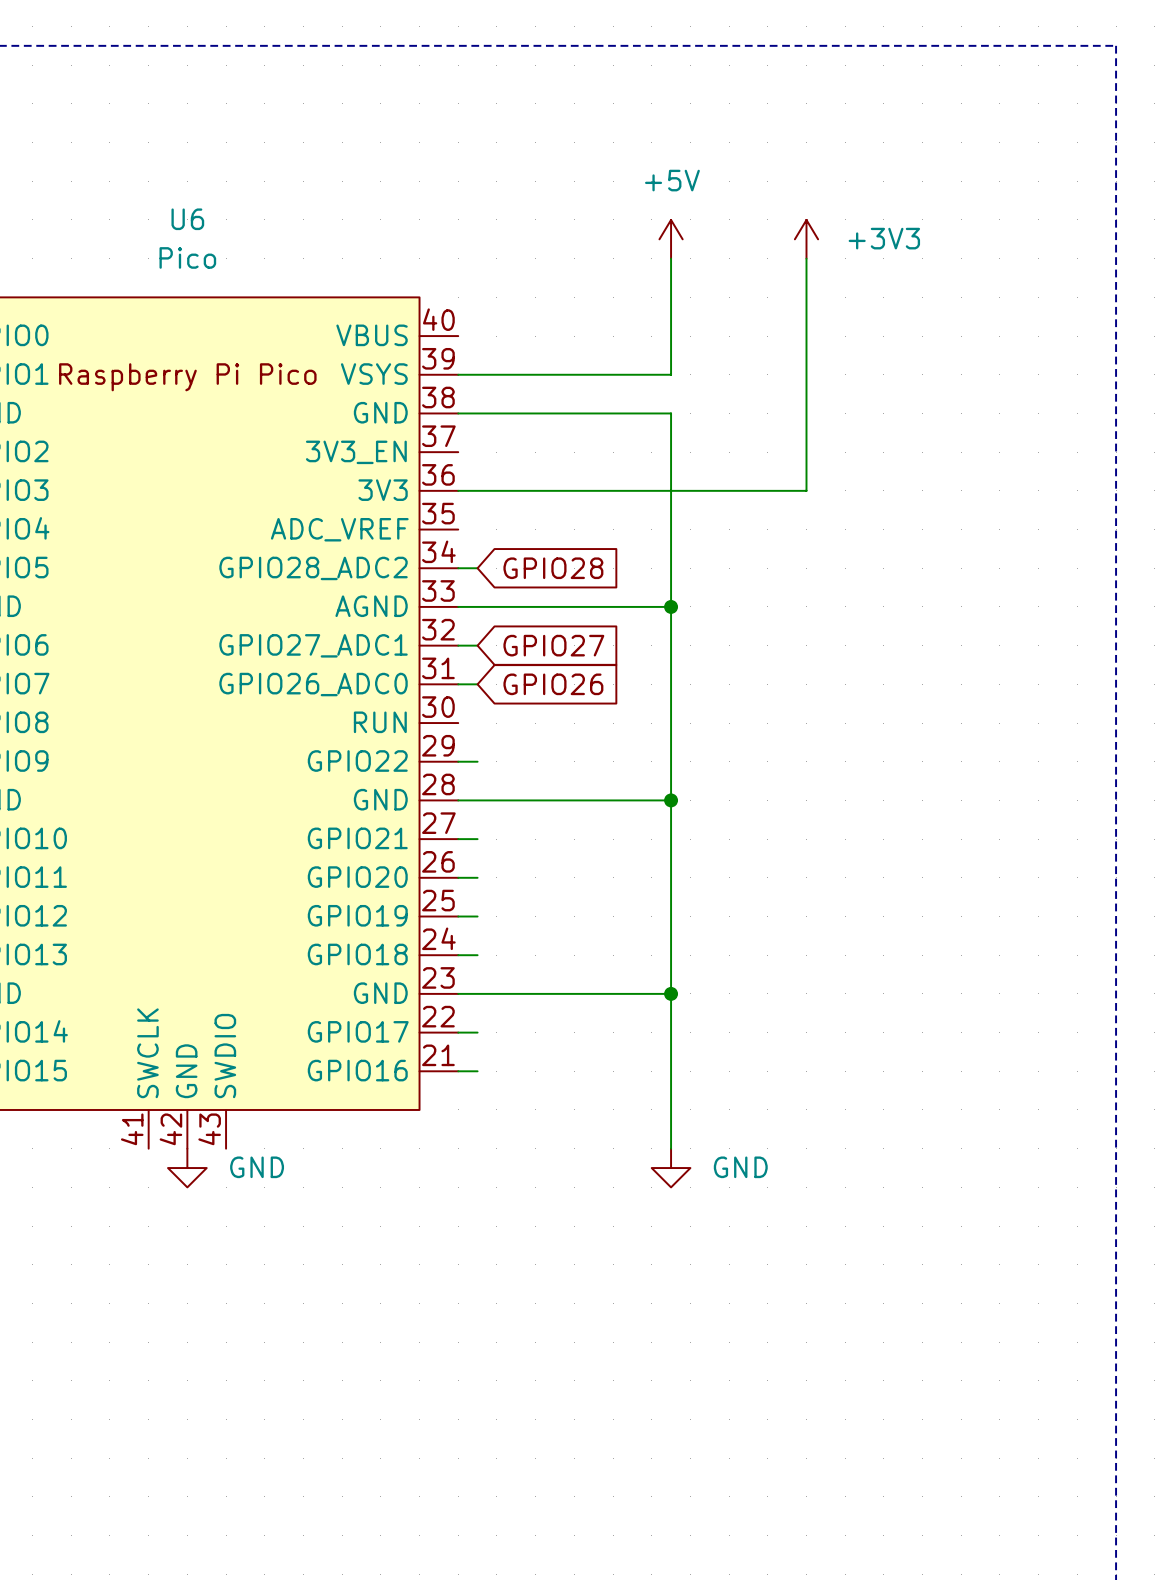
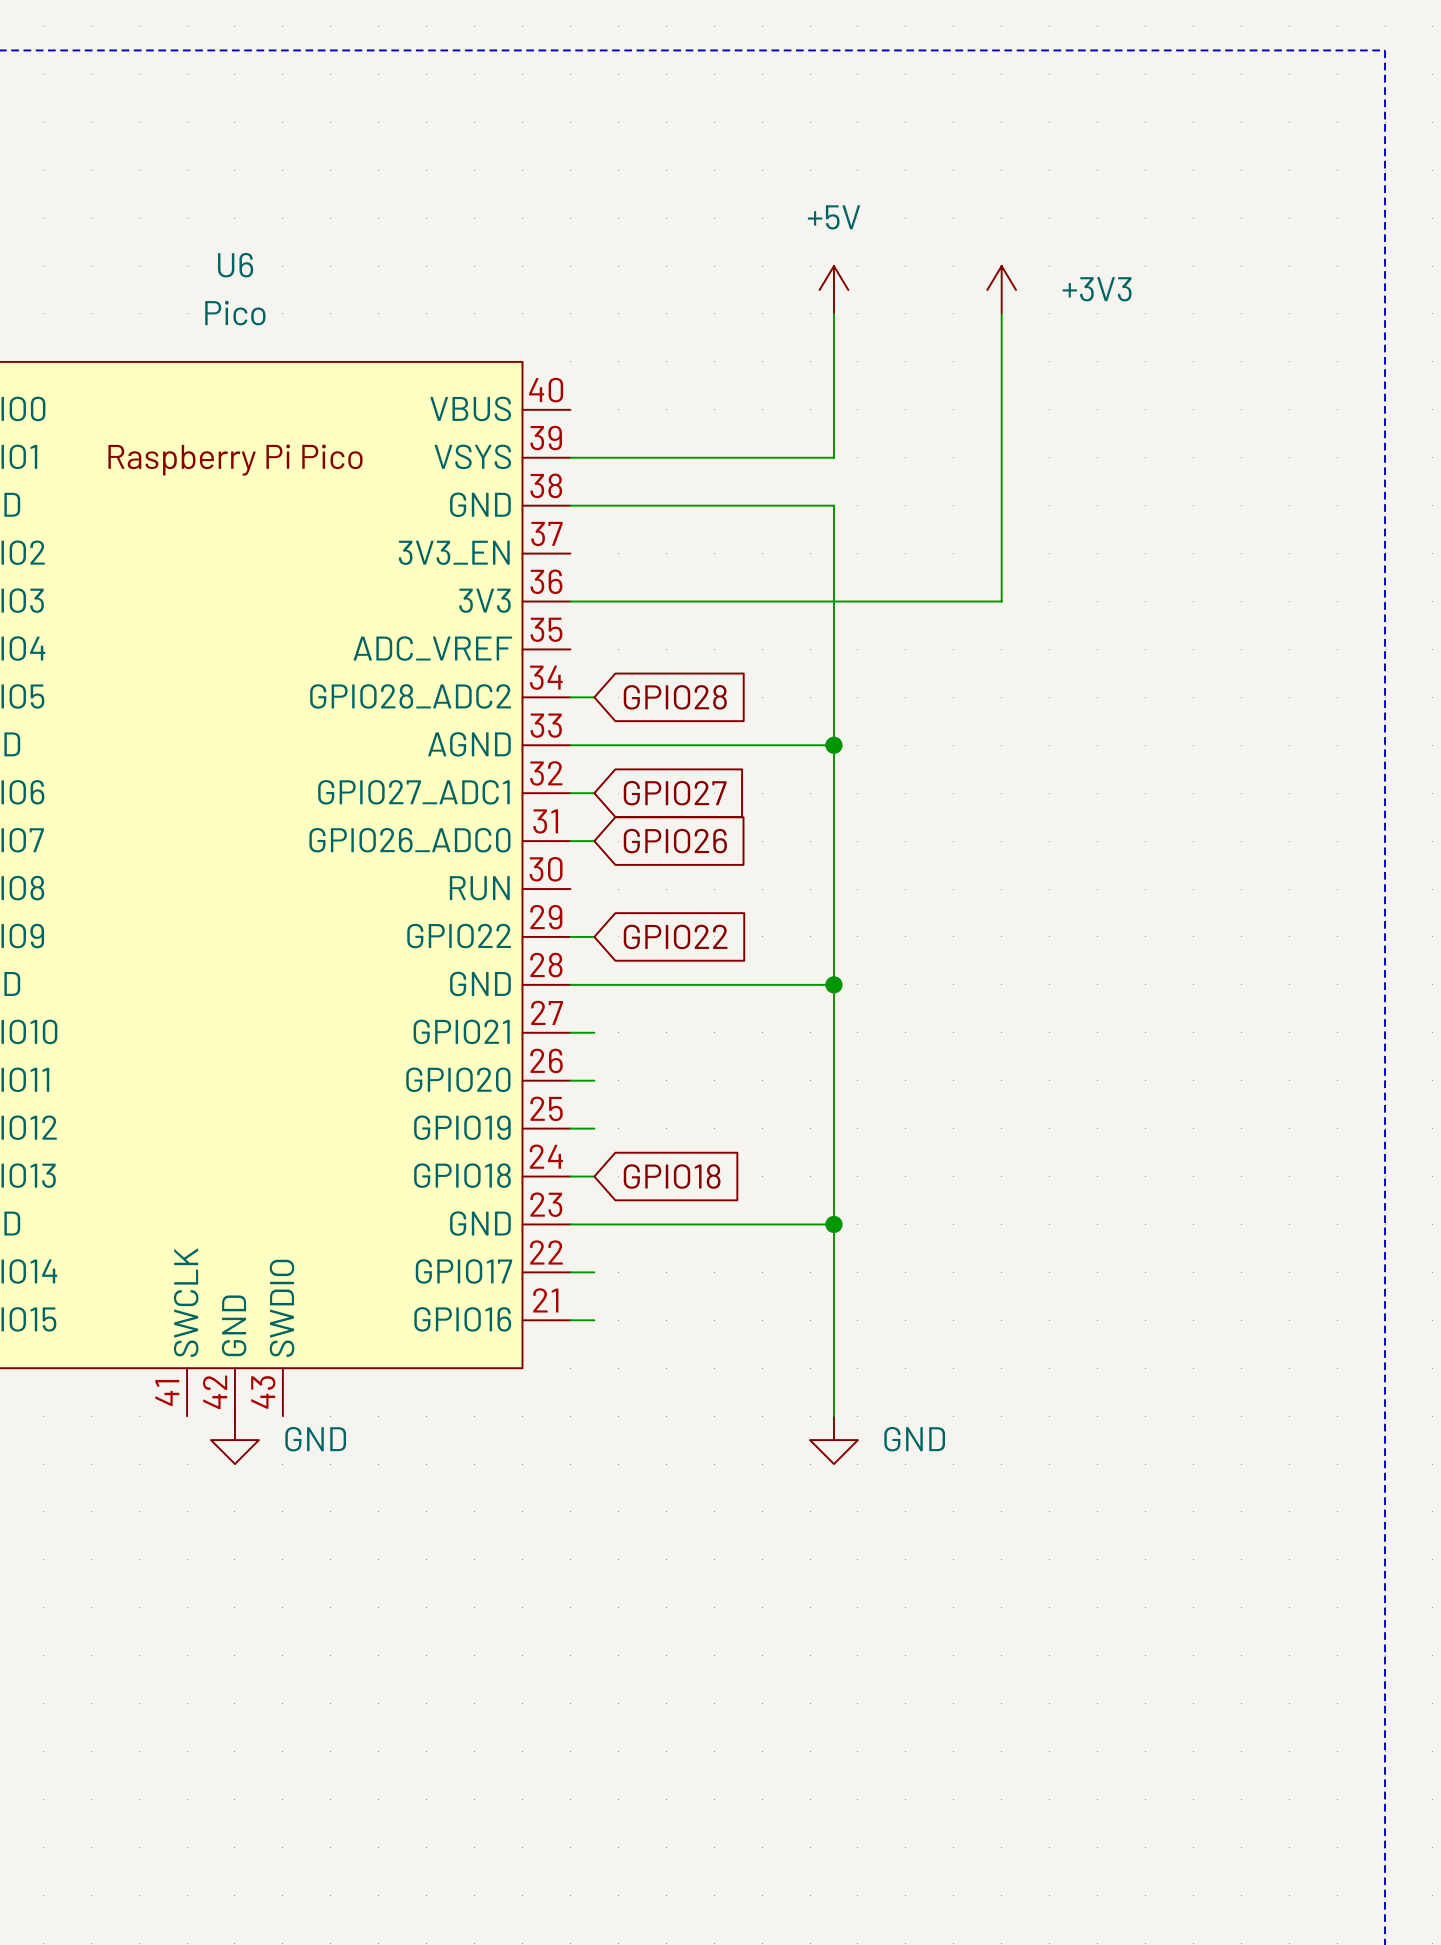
global label: none -> GPIO22 (675, 936)
global label: none -> GPIO18 (672, 1176)

